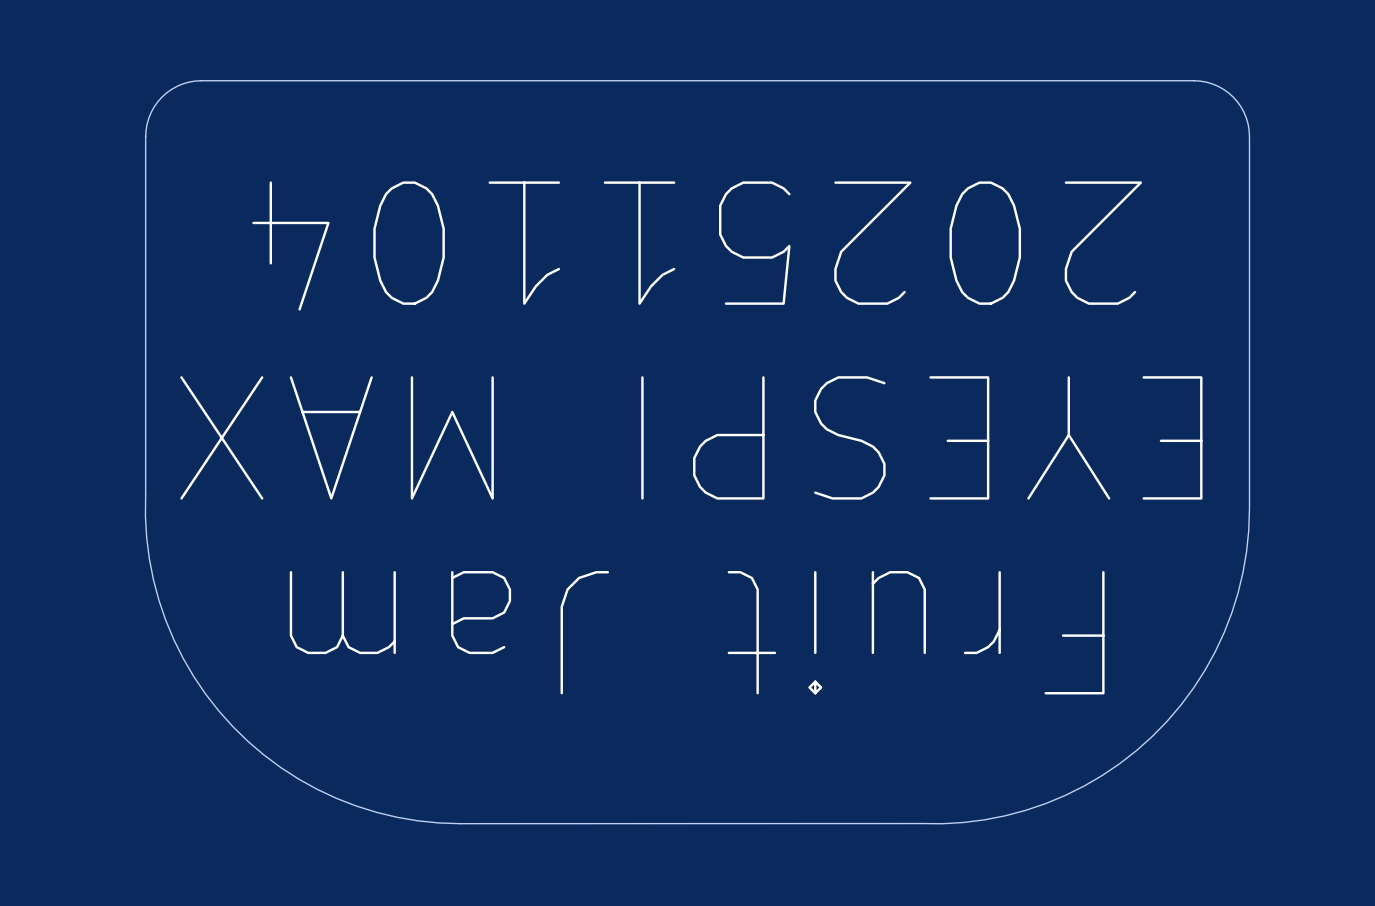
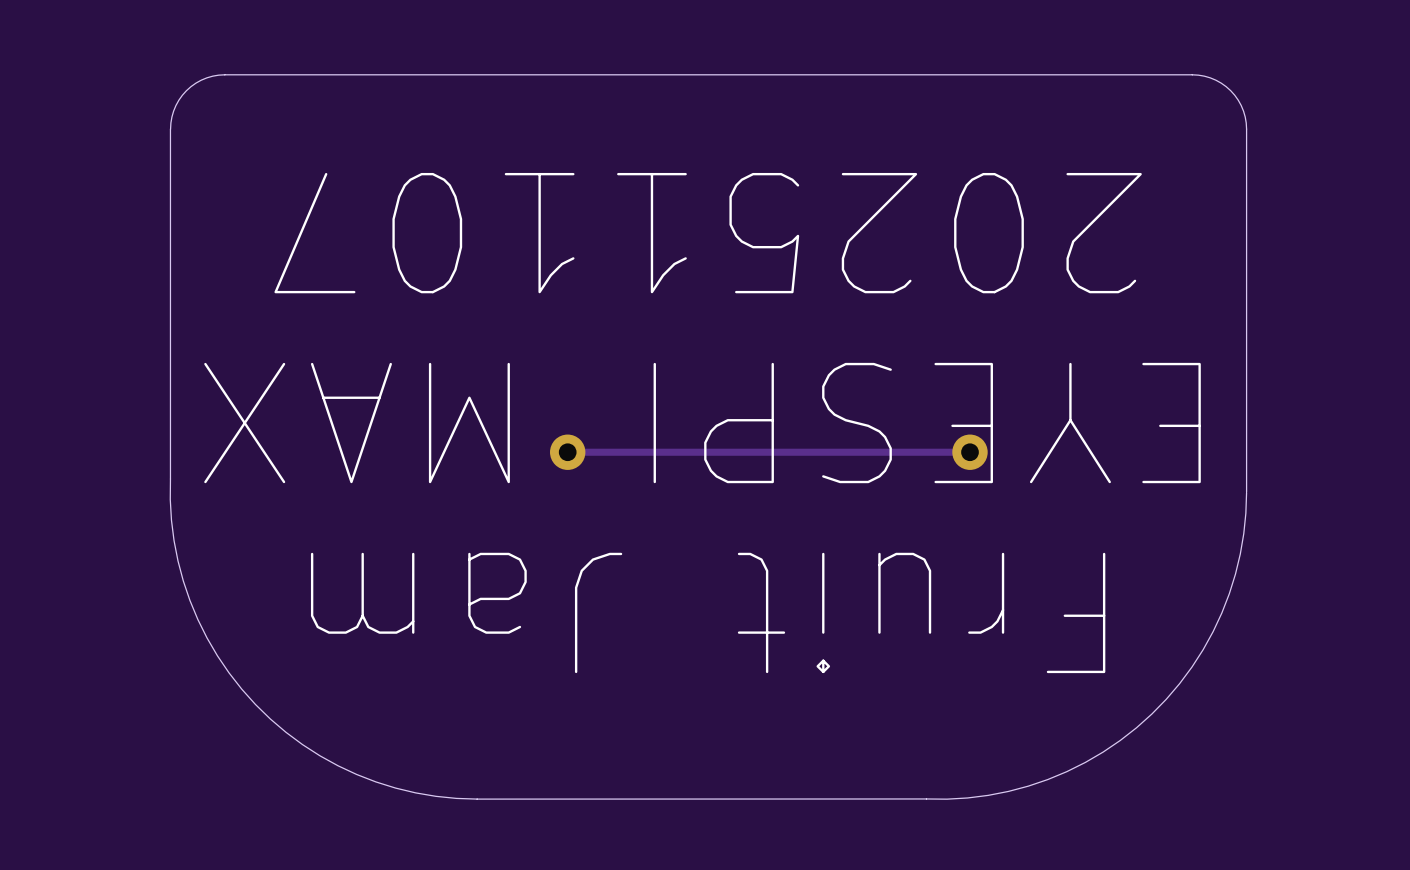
text: 20251104 (697, 246) -> 20251107 (708, 233)
via: none -> (567, 452)
track: none -> (970, 452) (567, 452)
via: none -> (970, 452)

